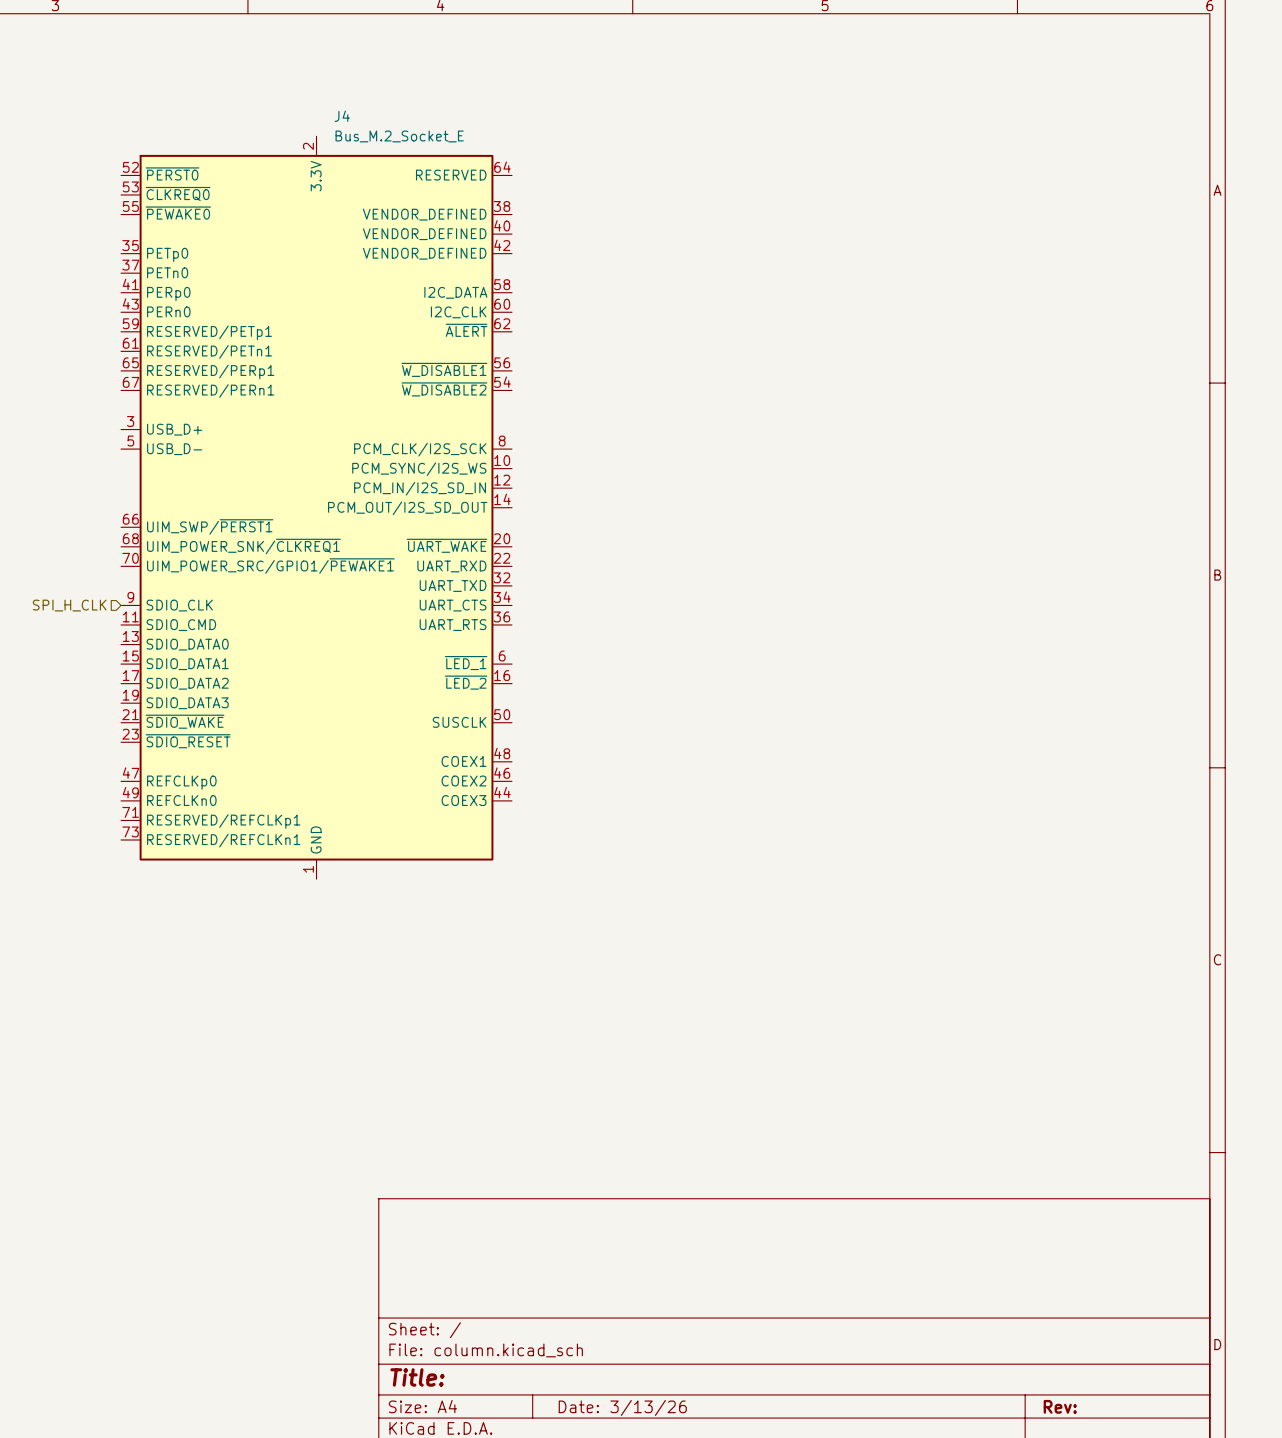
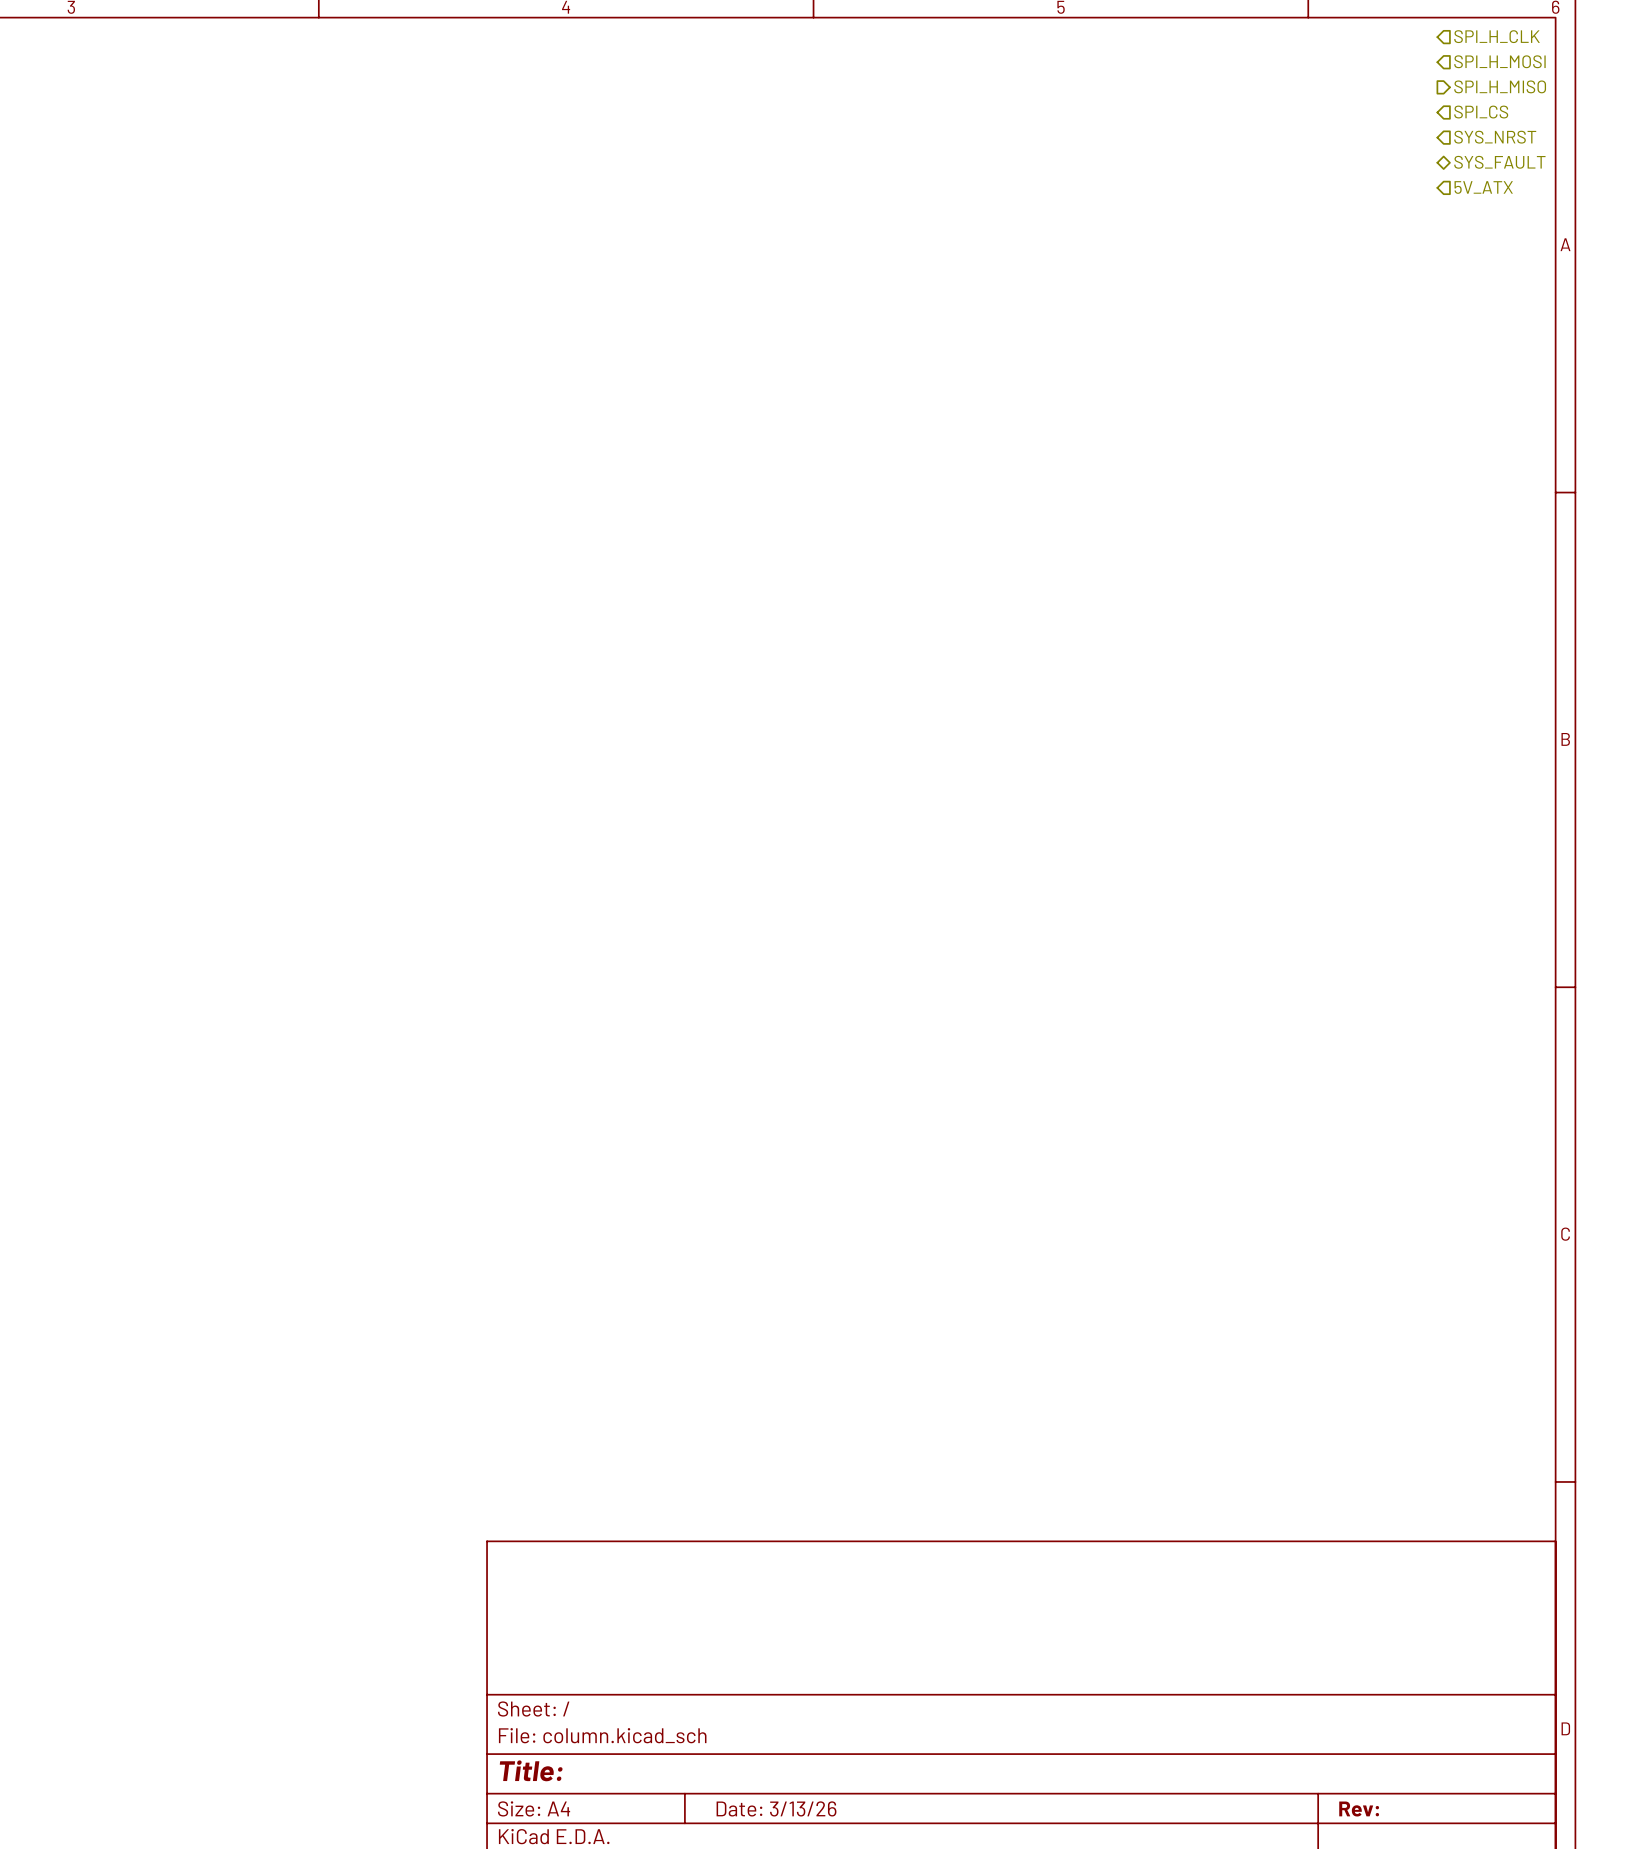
hierarchical label: none -> SPI_H_CLK (1497, 36)
hierarchical label: none -> SPI_H_MOSI (1499, 61)
hierarchical label: none -> SPI_H_MISO (1500, 86)
hierarchical label: none -> SPI_CS (1481, 112)
hierarchical label: none -> SYS_NRST (1495, 137)
hierarchical label: none -> SYS_FAULT (1499, 162)
hierarchical label: none -> 5V_ATX (1483, 187)
J4: Bus_M.2_Socket_E (316, 507) -> none
hierarchical label: SPI_H_CLK (69, 605) -> none

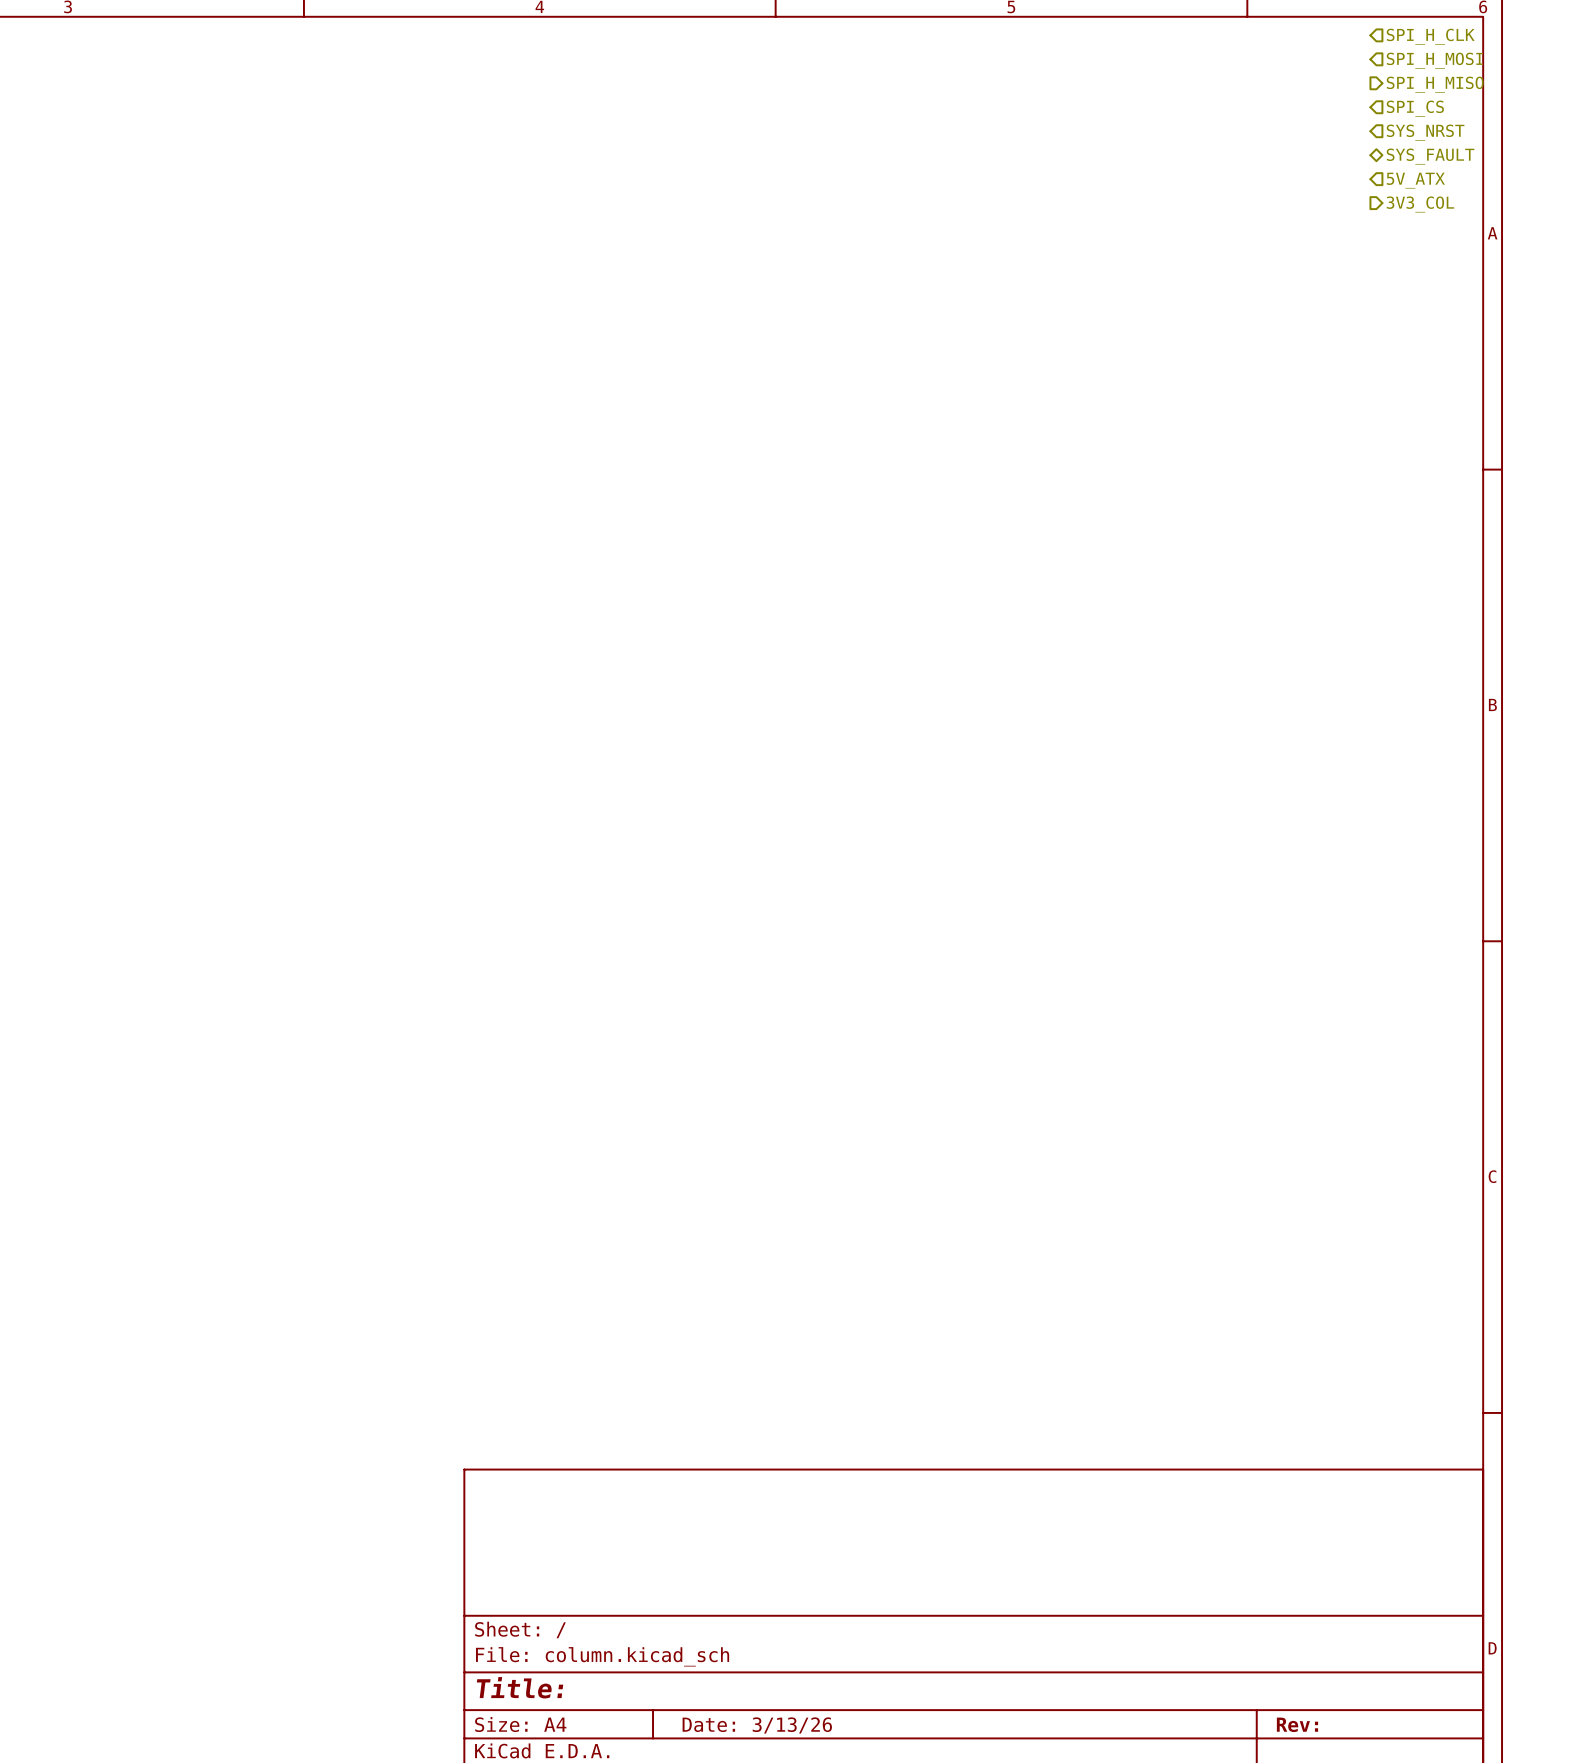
hierarchical label: none -> 3V3_COL (1420, 204)

